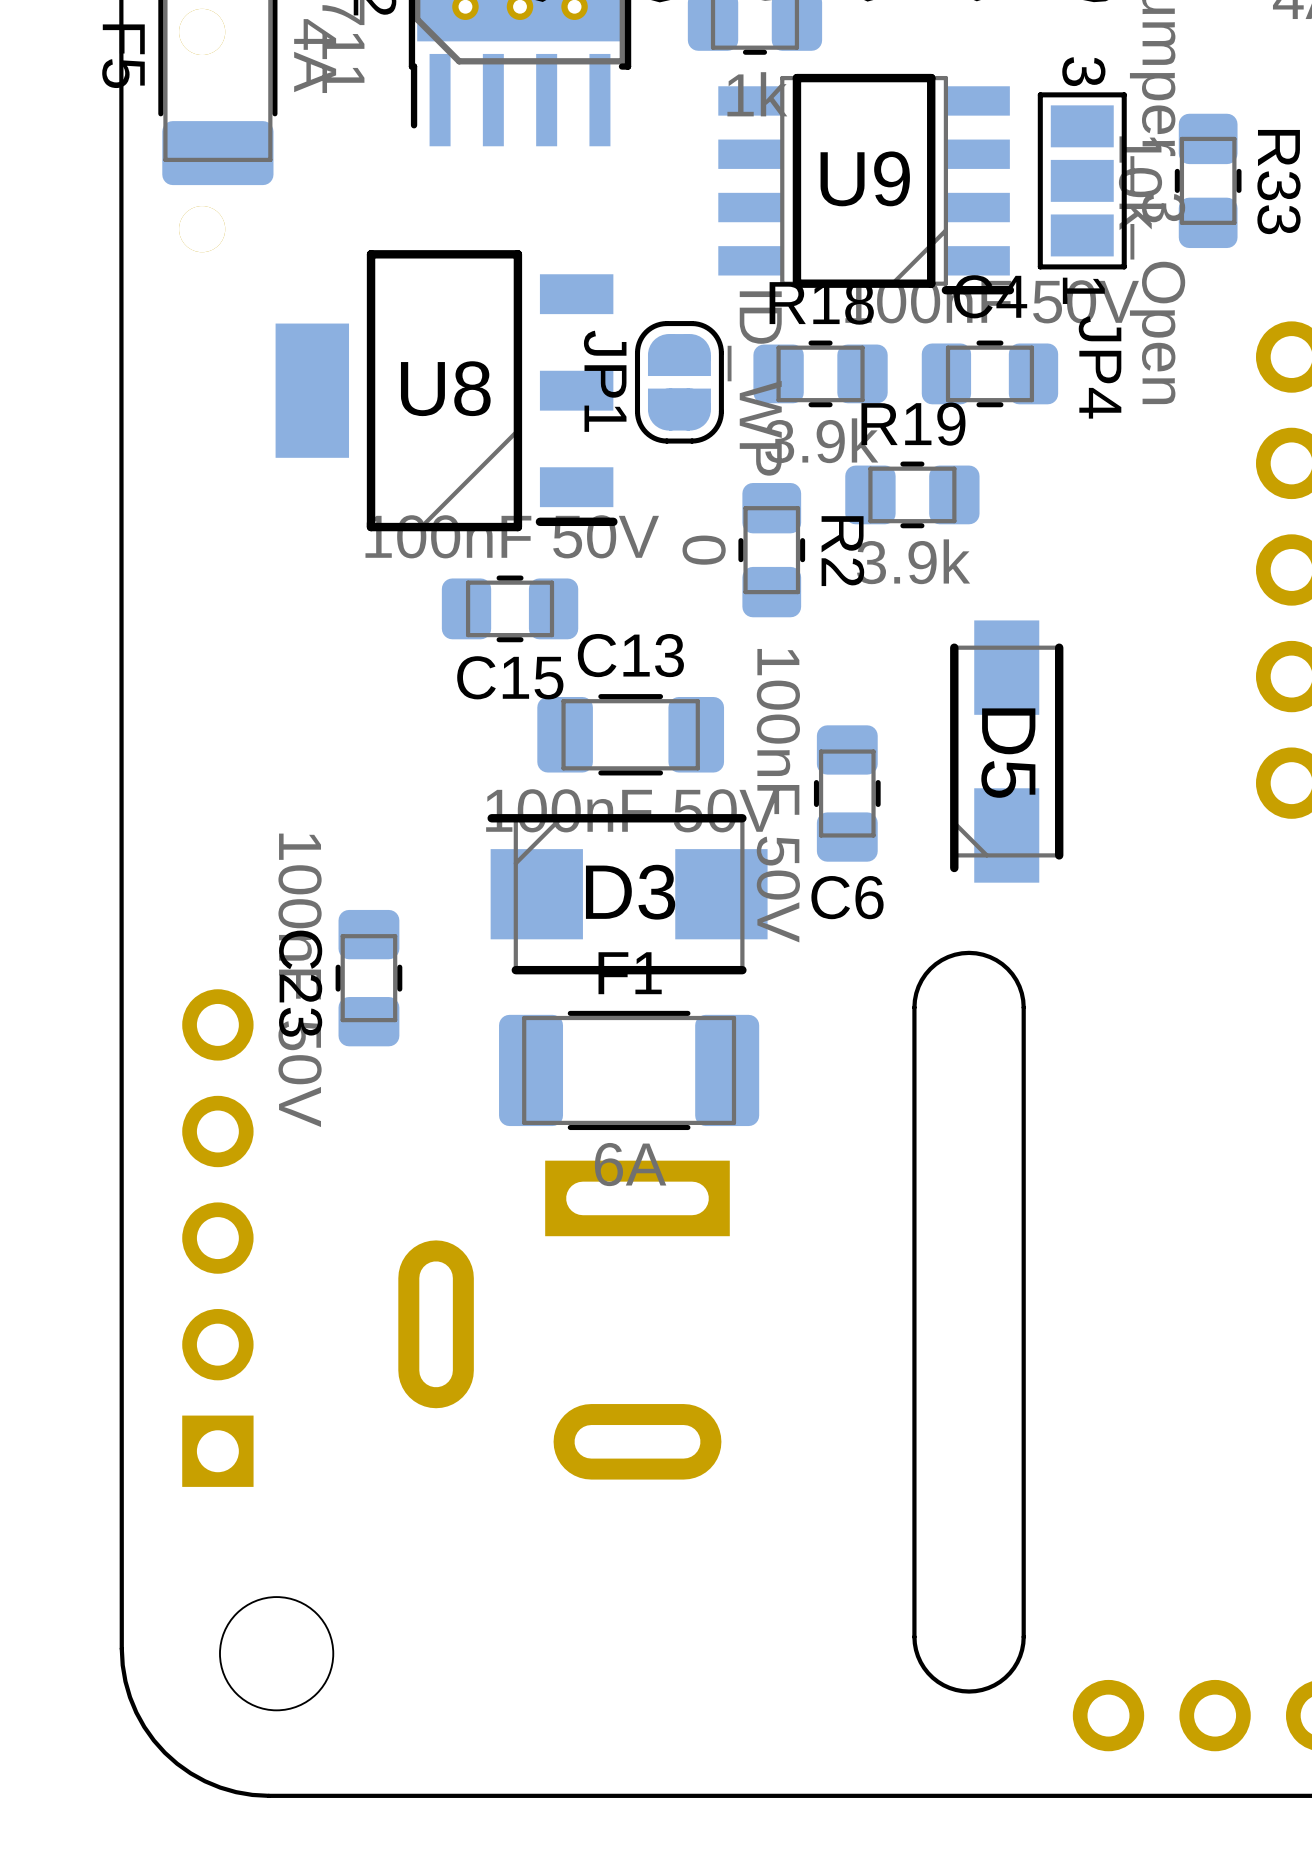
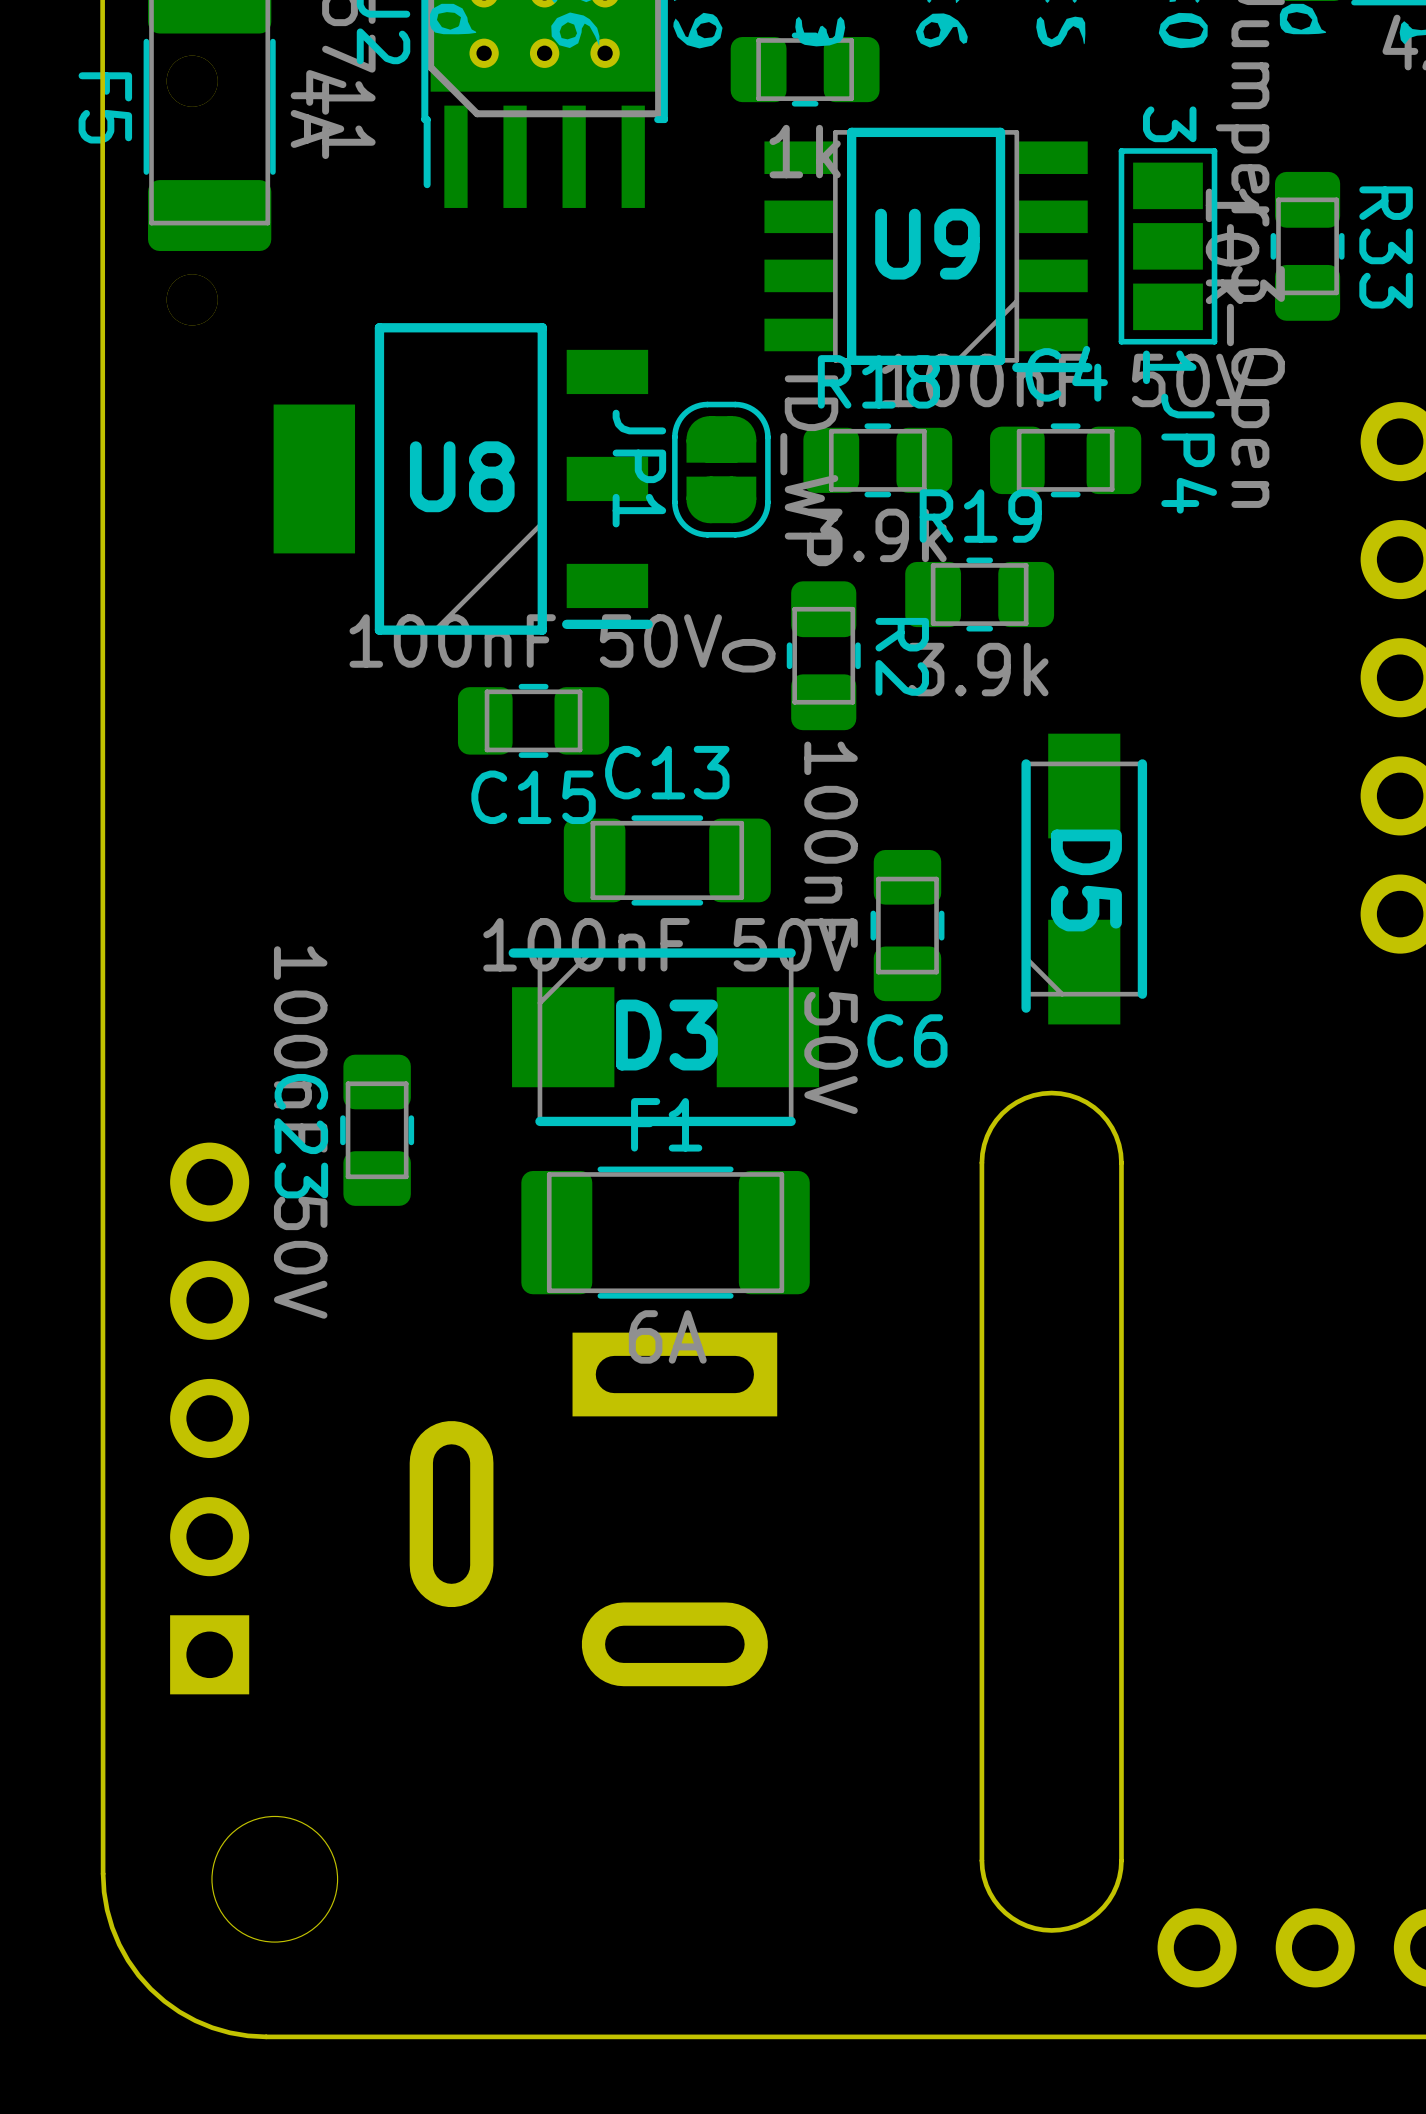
board edge: (914, 1007) (918, 986) (930, 968) (948, 957) (969, 952) (989, 957) (1007, 968) (1019, 986) (1023, 1007) (1023, 1643) (1017, 1662) (1005, 1677) (988, 1688) (975, 1691) (962, 1691) (943, 1685) (928, 1673) (917, 1656) (914, 1636) -> (981, 1162) (987, 1136) (1002, 1113) (1024, 1098) (1051, 1093) (1078, 1098) (1101, 1113) (1116, 1136) (1121, 1162) (1121, 1860) (1119, 1877) (1109, 1900) (1091, 1918) (1068, 1928) (1043, 1929) (1019, 1922) (999, 1906) (986, 1885) (981, 1860)

